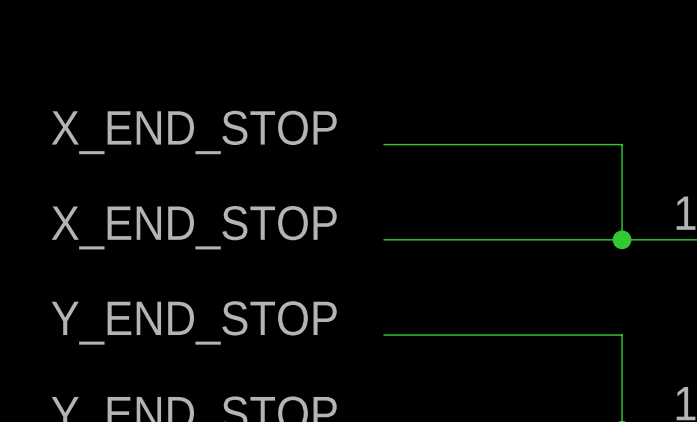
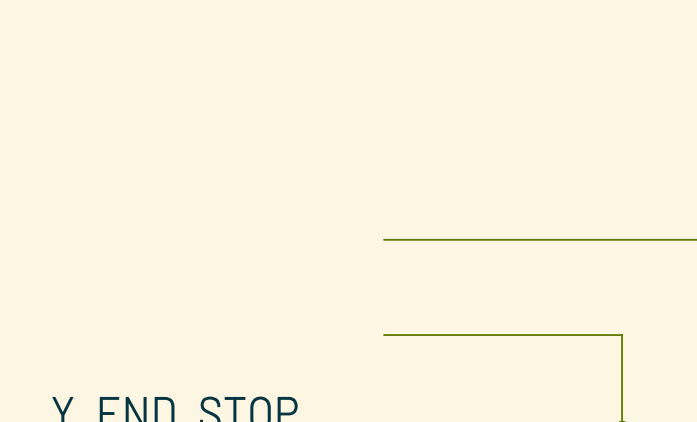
label: X_END_STOP (194, 132) -> none
wire: (383, 144) (622, 144) (622, 239) -> none
label: X_END_STOP (194, 227) -> none
junction: (622, 239) -> none
label: Y_END_STOP (194, 322) -> none

